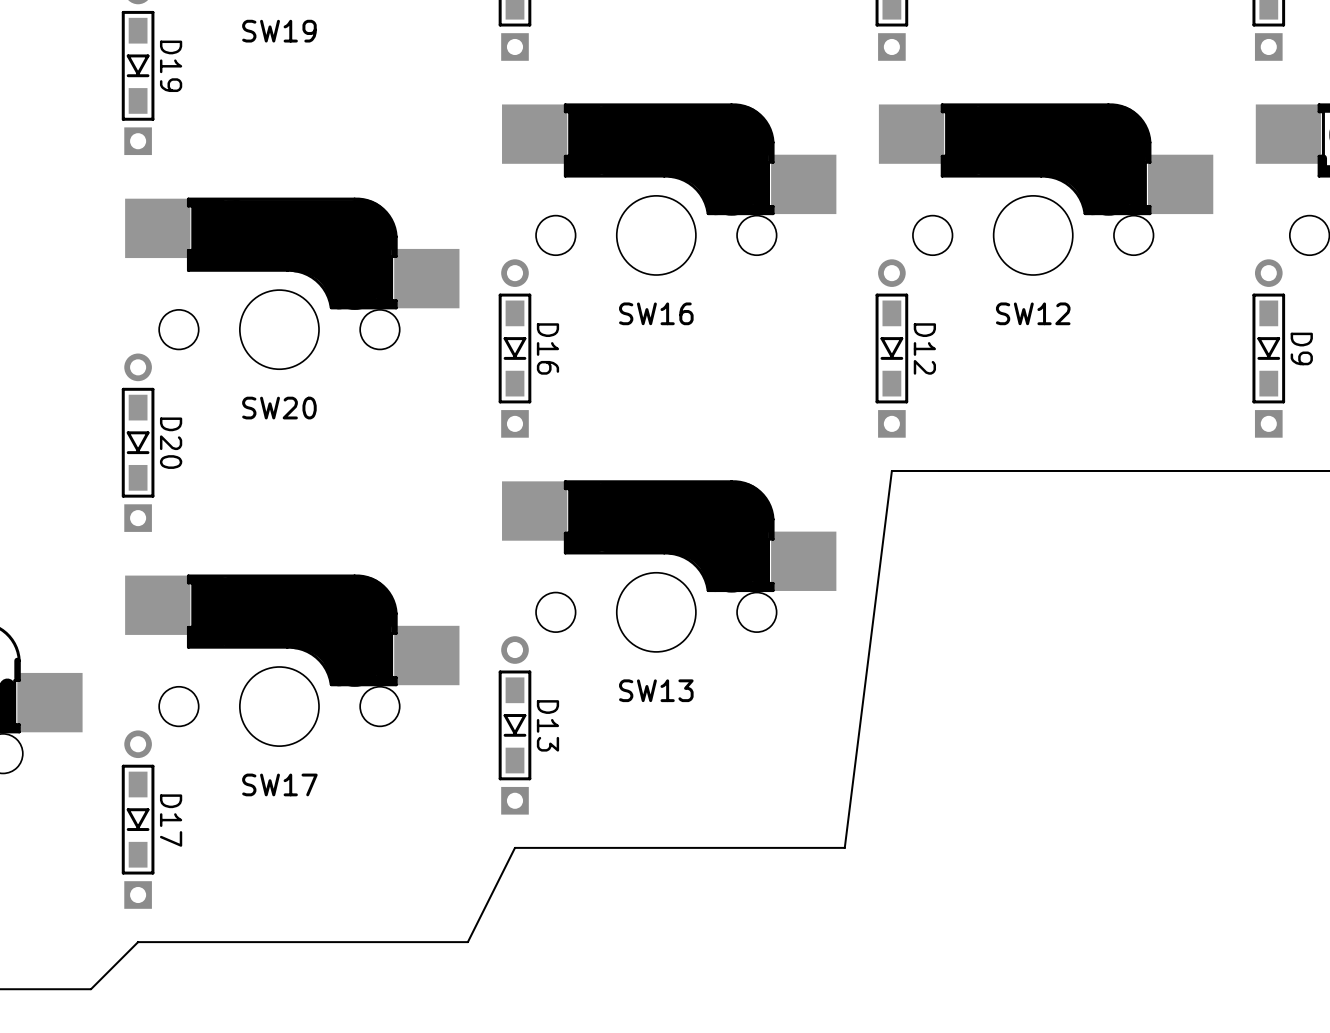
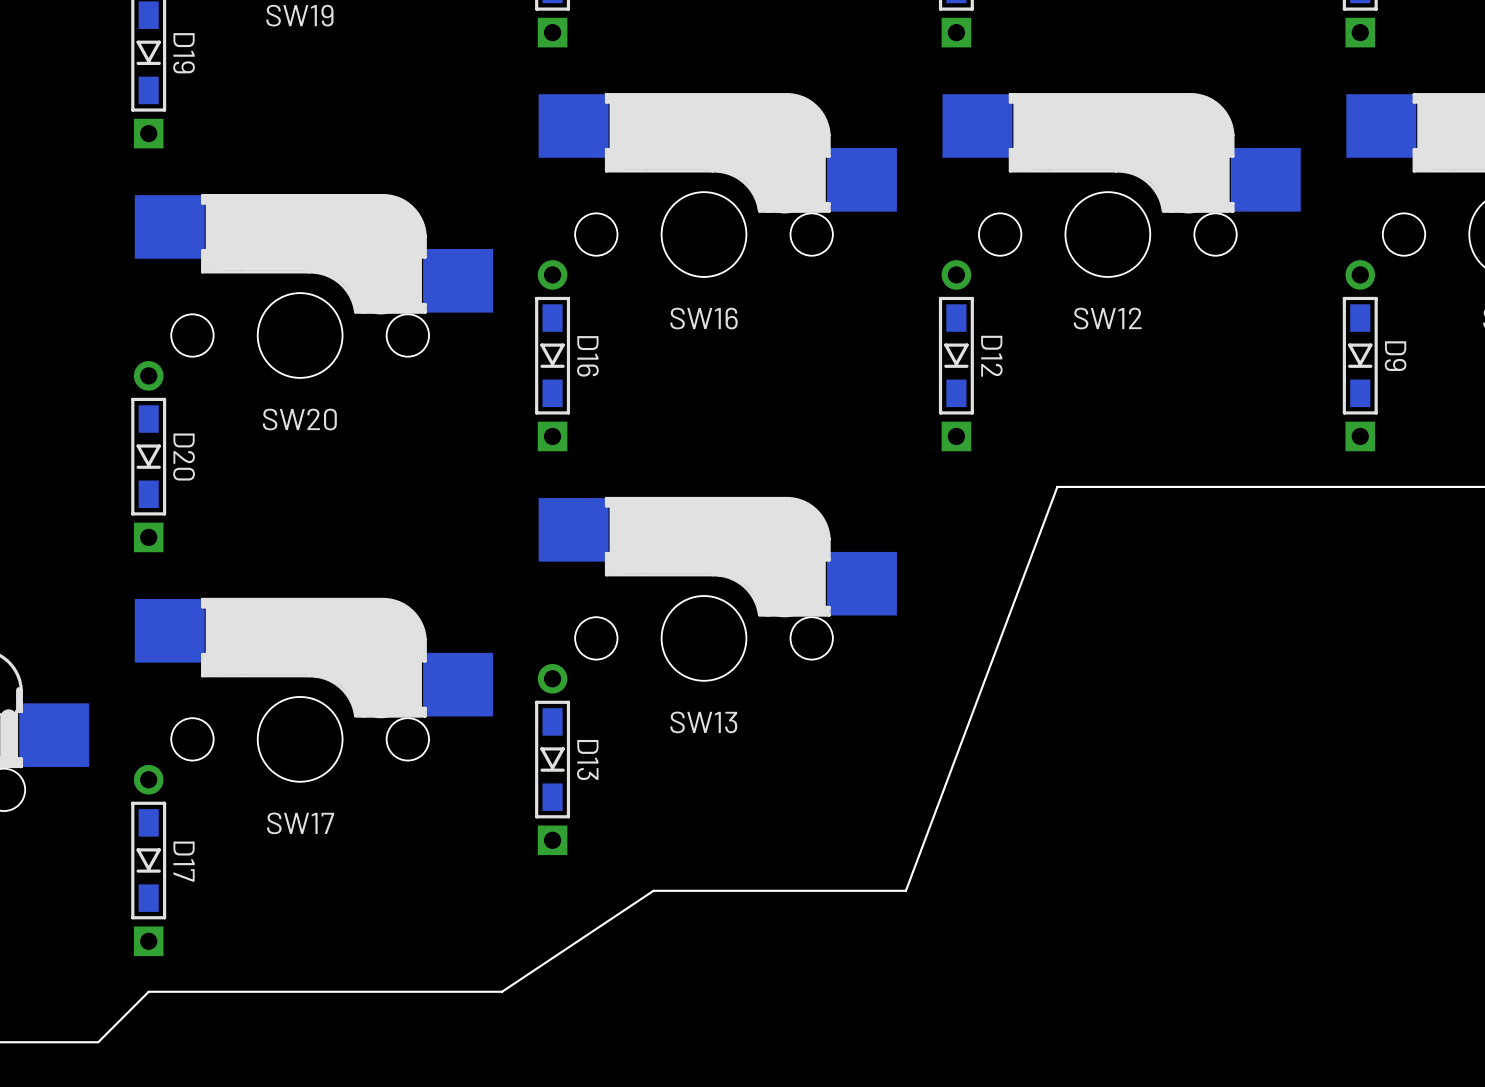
board edge: (986, 470) (891, 470) (844, 847) -> (1057, 486) (905, 890)
board edge: (609, 847) (514, 847) (467, 942) -> (653, 890) (502, 991)

